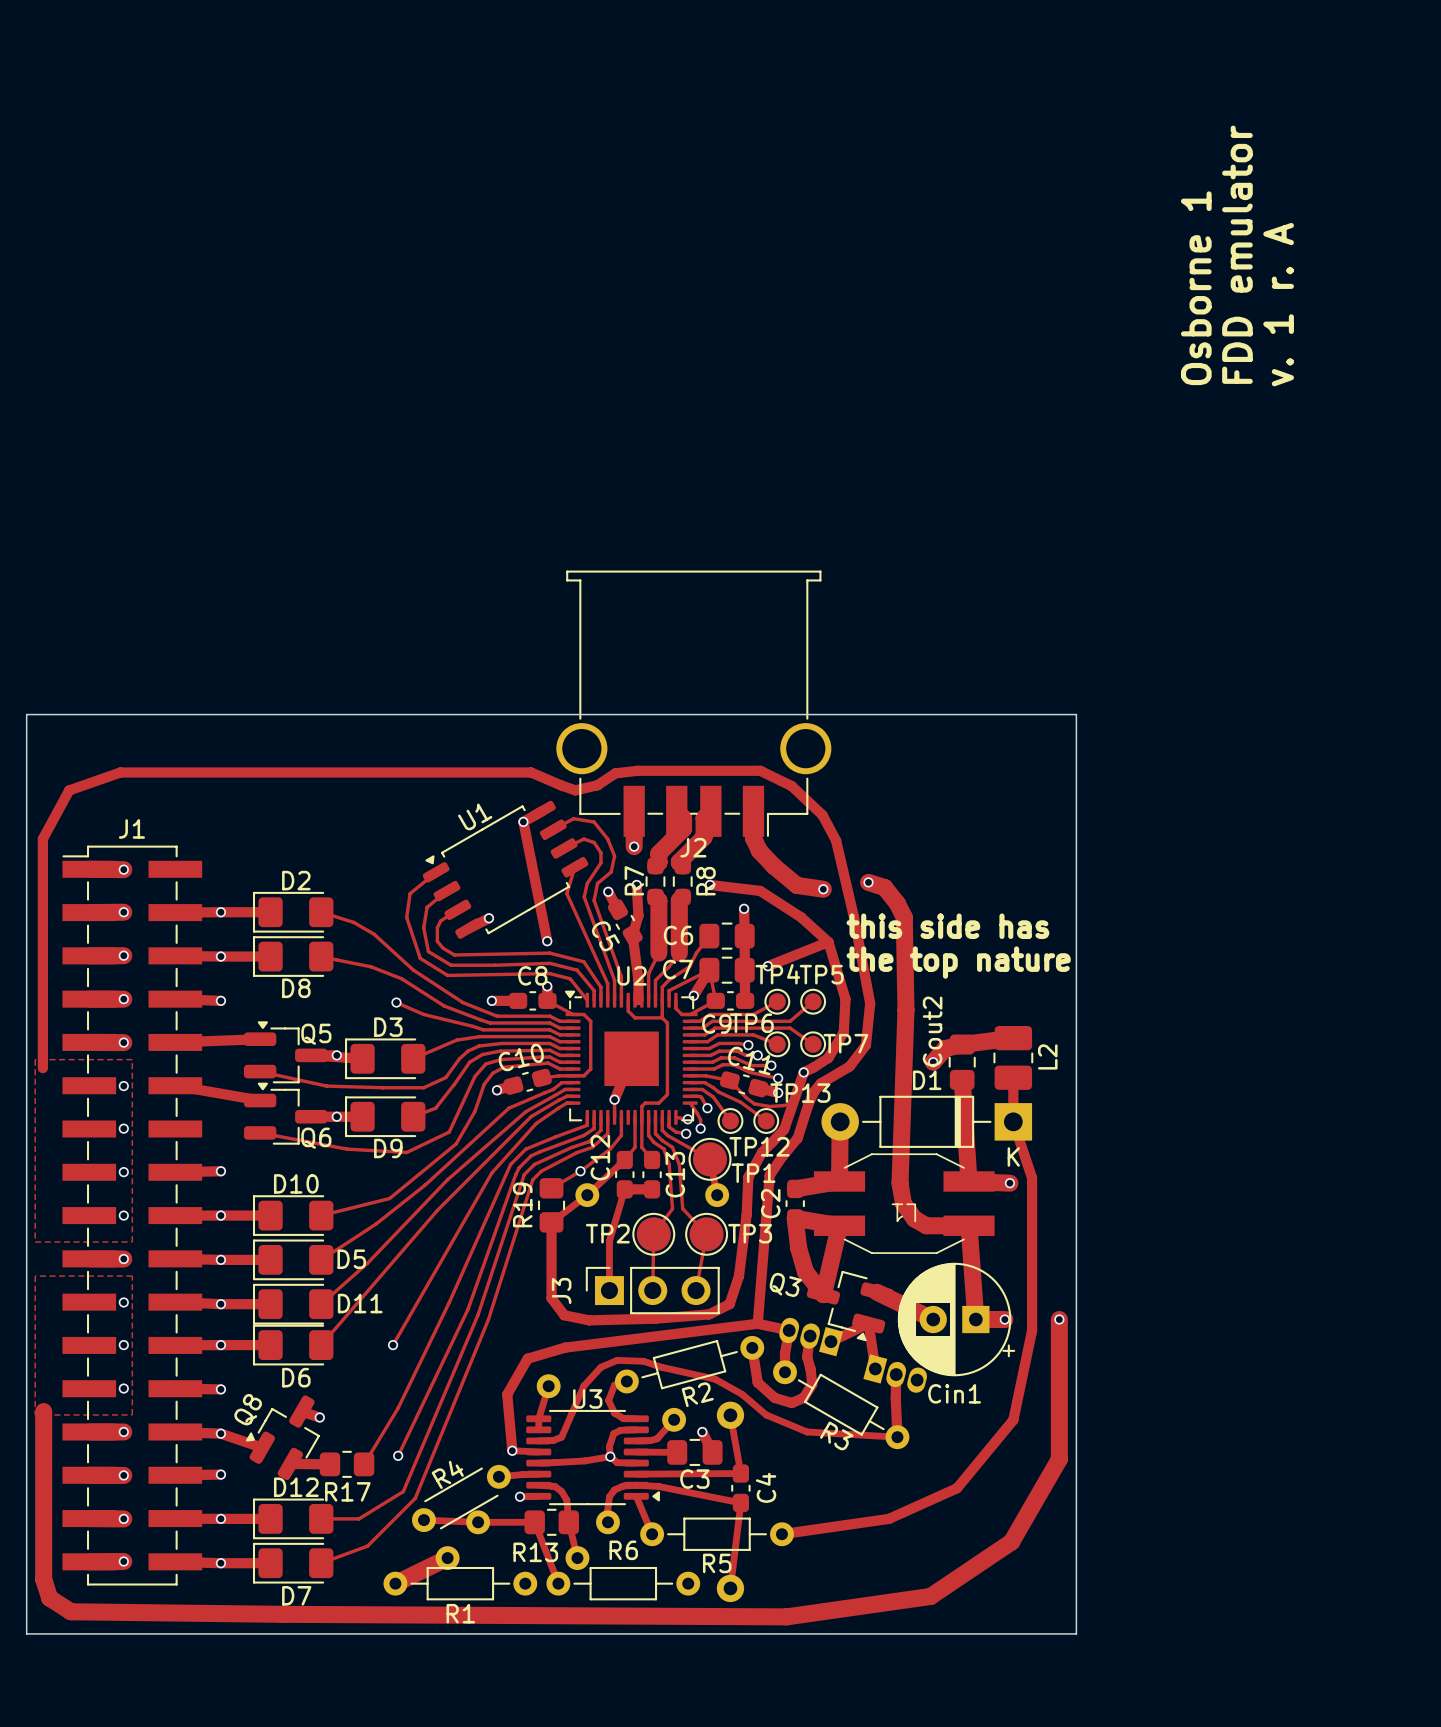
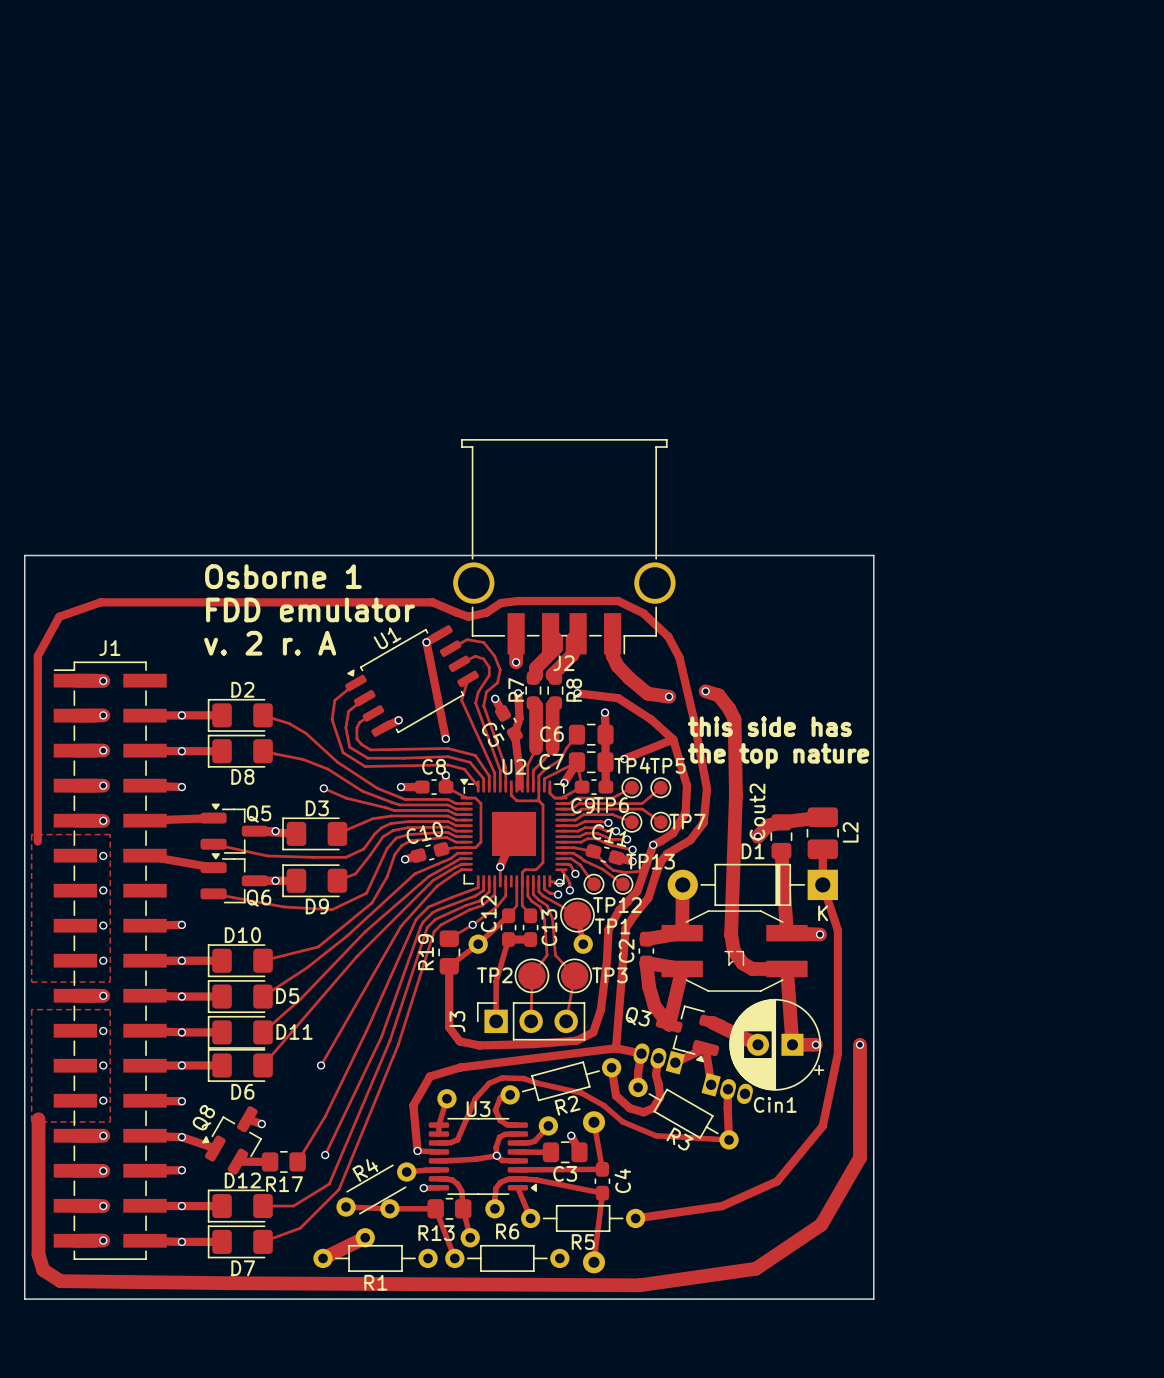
text: FDD emulator (1237, 254) -> none
text: Osborne 1 (1196, 288) -> none
text: v. 1 r. A (1278, 304) -> none
text: none -> Osborne 1 (283, 576)
text: none -> FDD emulator (310, 609)
text: none -> v. 2 r. A (270, 643)

